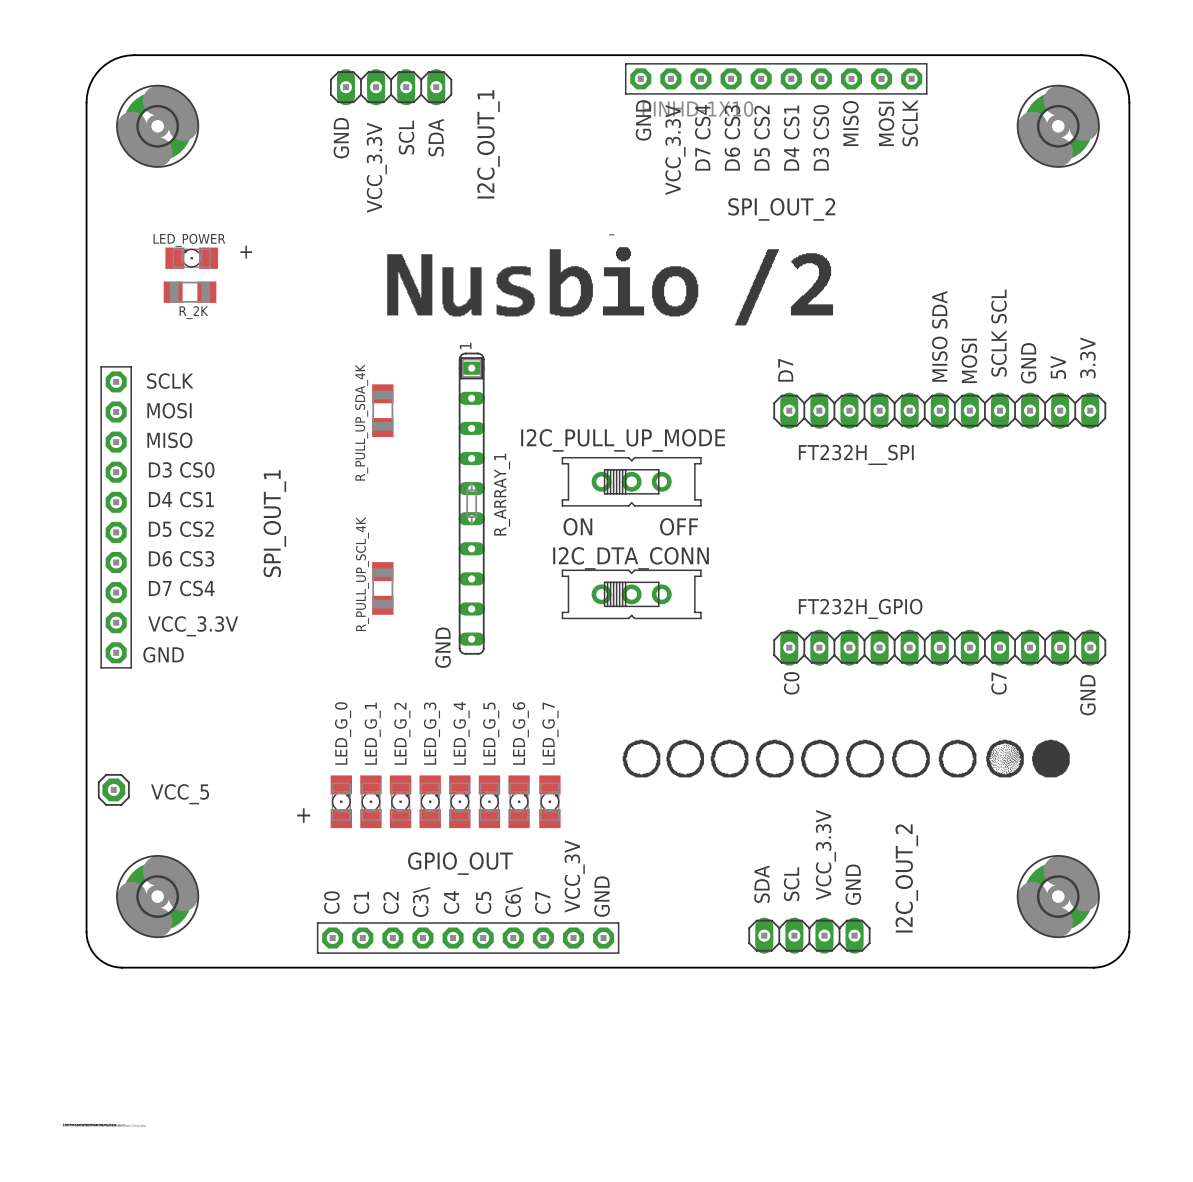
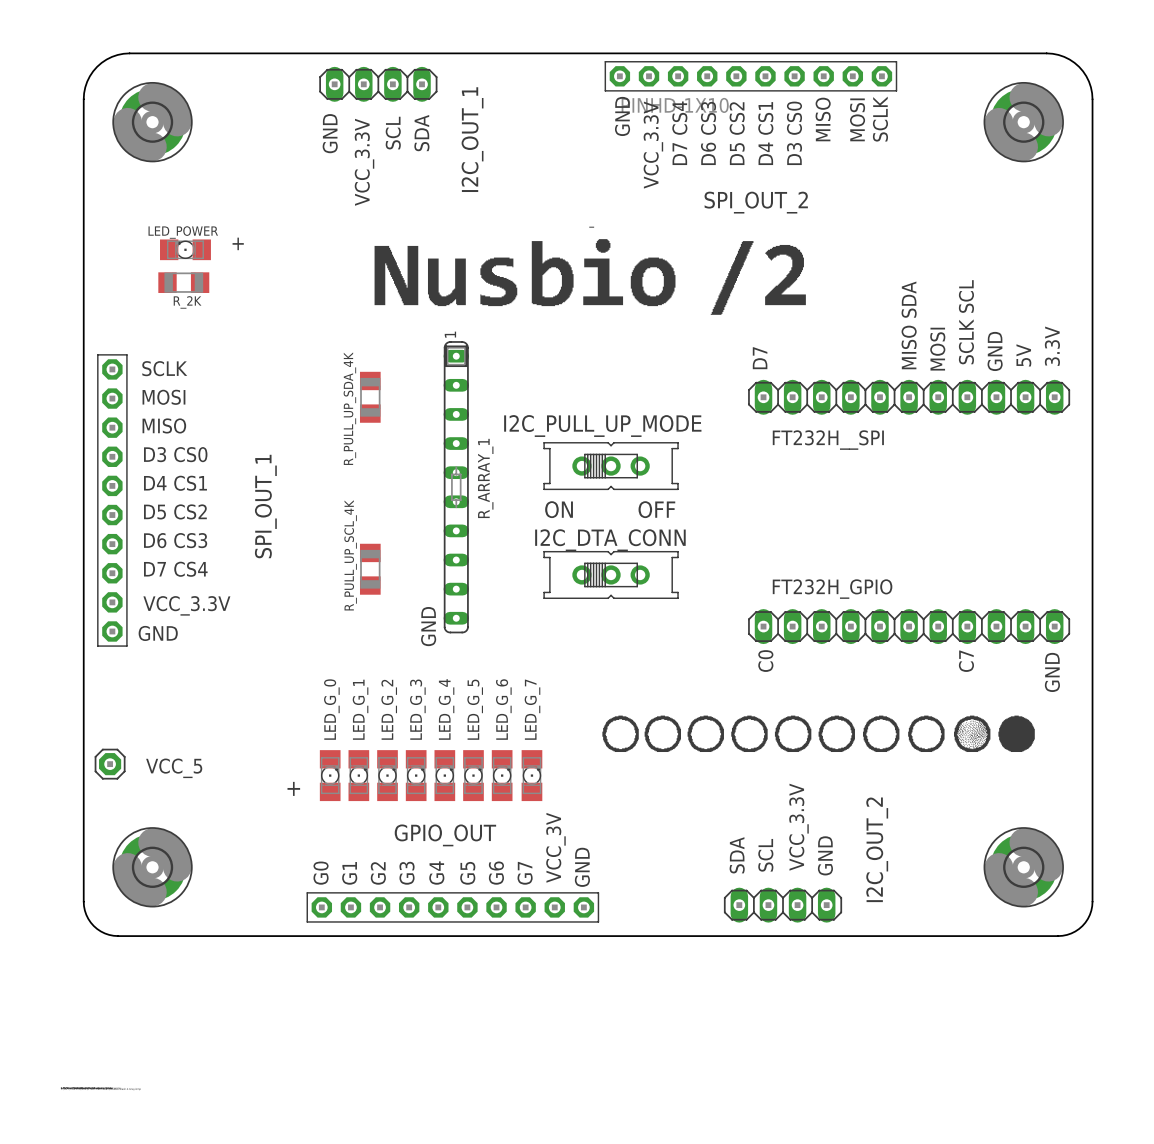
text: C3\ (421, 901) -> G3 (407, 873)
text: C6\ (513, 901) -> G6 (496, 873)
text: C0 (331, 902) -> G0 (321, 873)
text: C1 (361, 902) -> G1 (349, 873)
text: C2 (391, 902) -> G2 (378, 873)
text: C4 (451, 902) -> G4 (436, 873)
text: C5 (483, 902) -> G5 (467, 873)
text: C7 (542, 902) -> G7 (525, 873)

